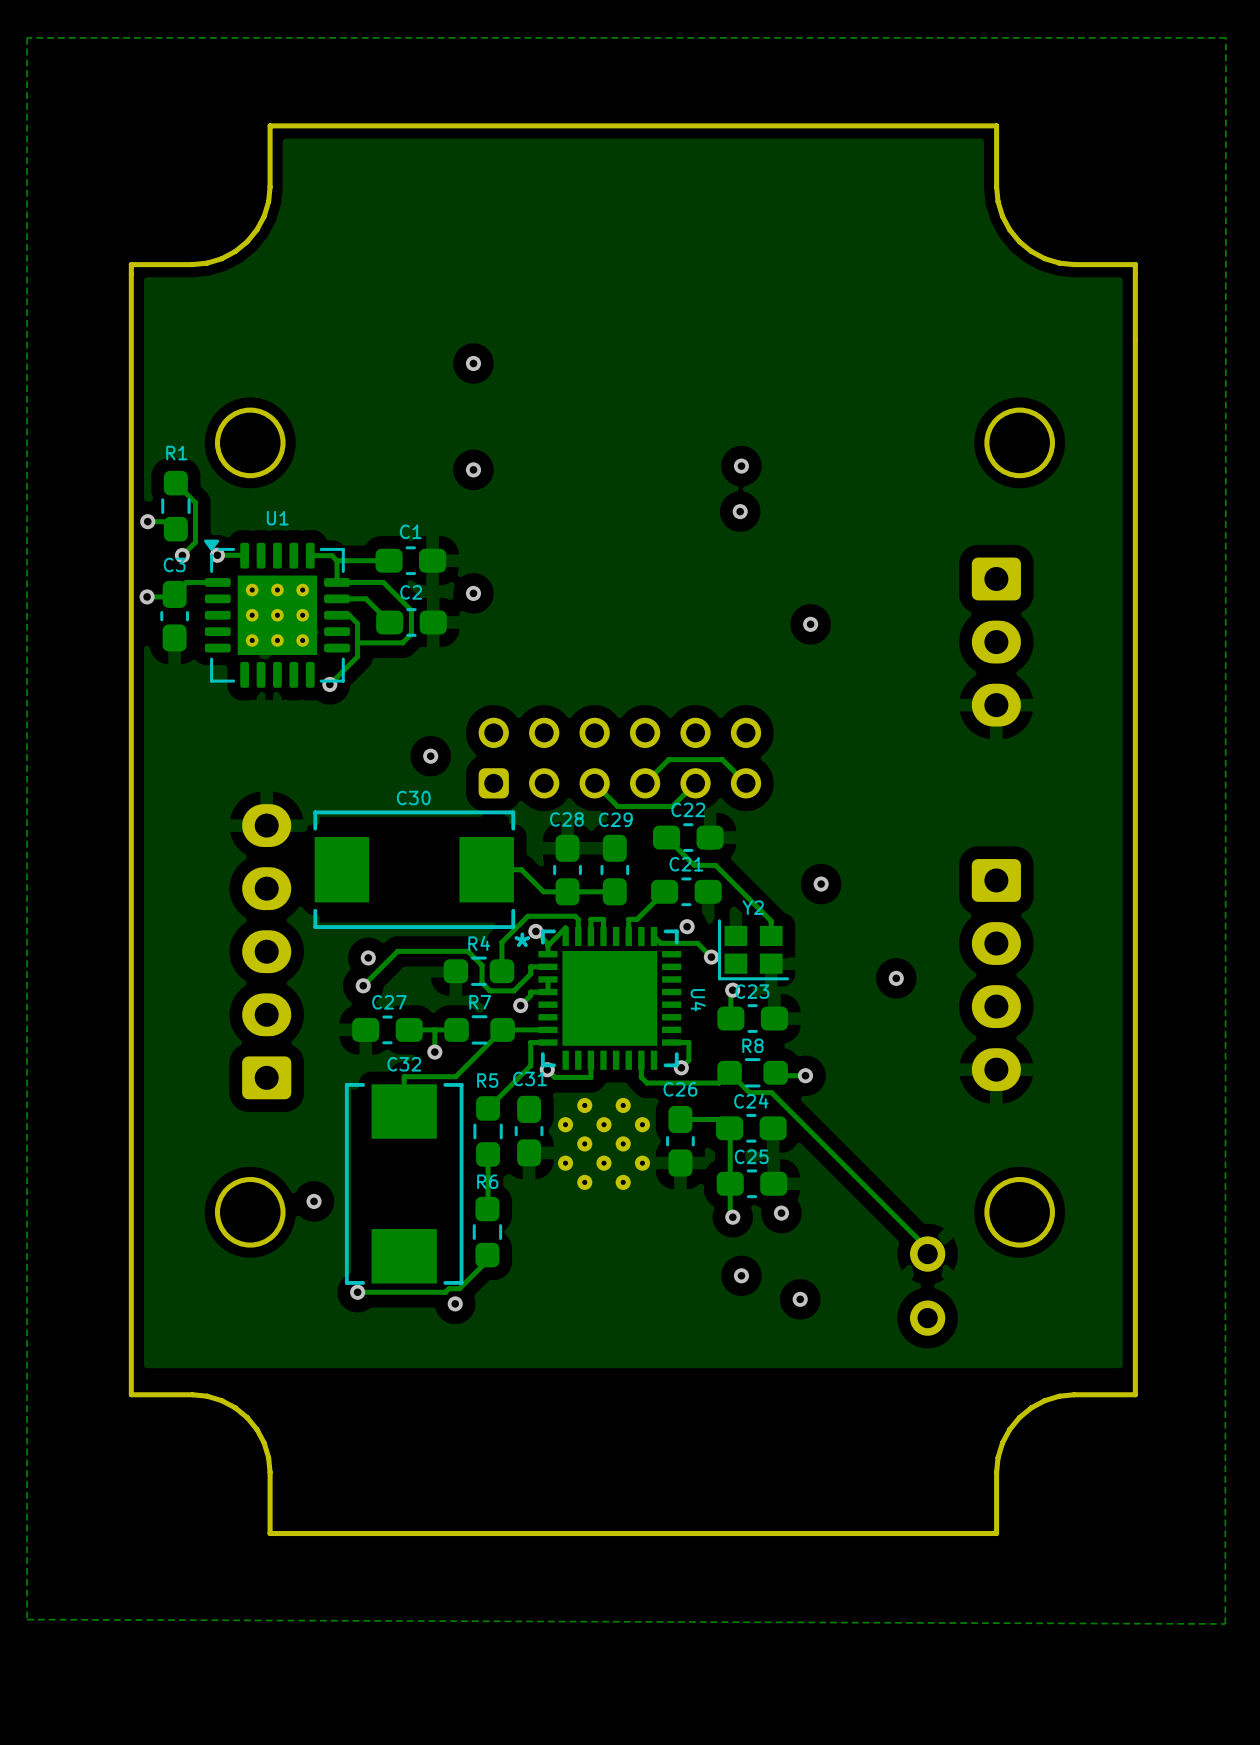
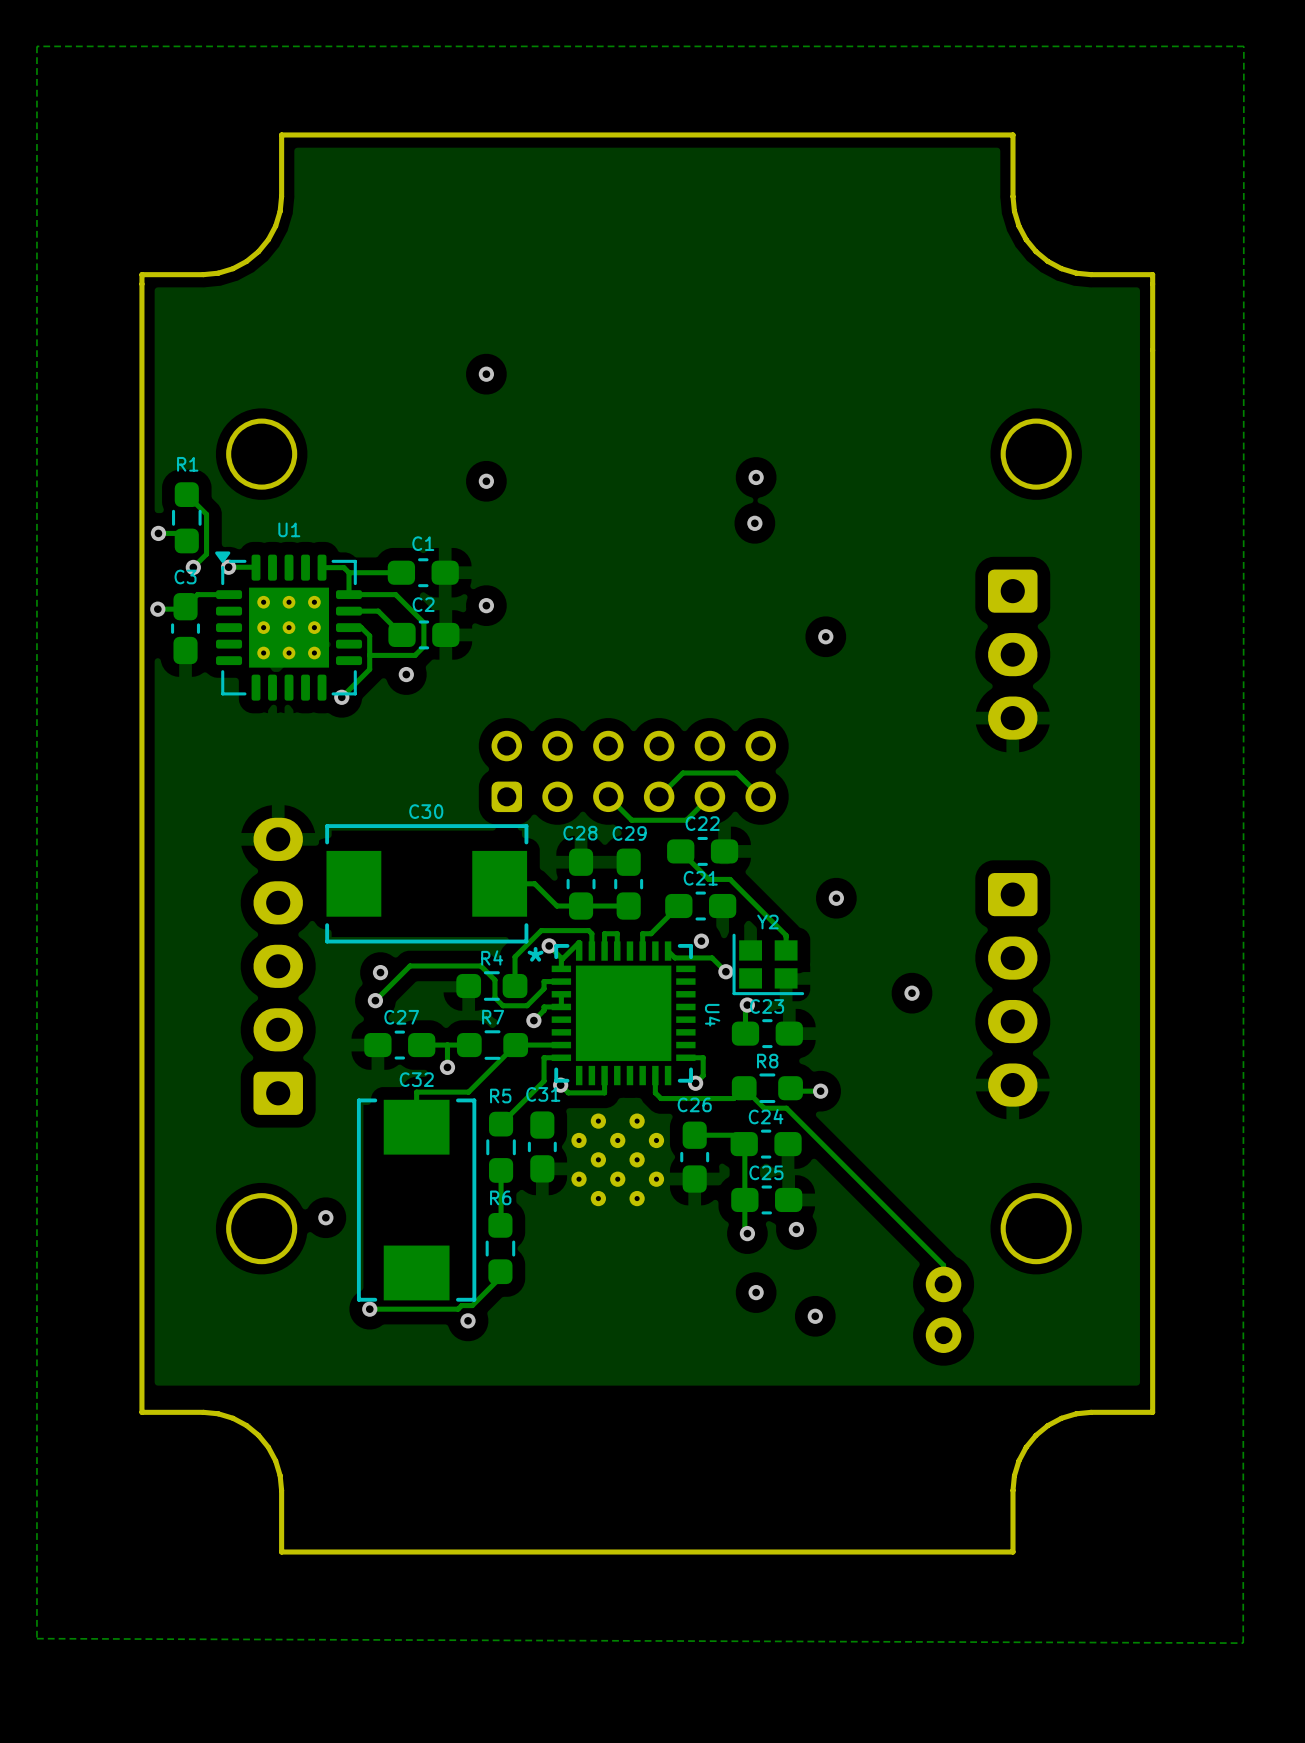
via position: (430, 756) -> (406, 674)
part footprint: [909, 1236, 946, 1336] -> [925, 1266, 962, 1353]

